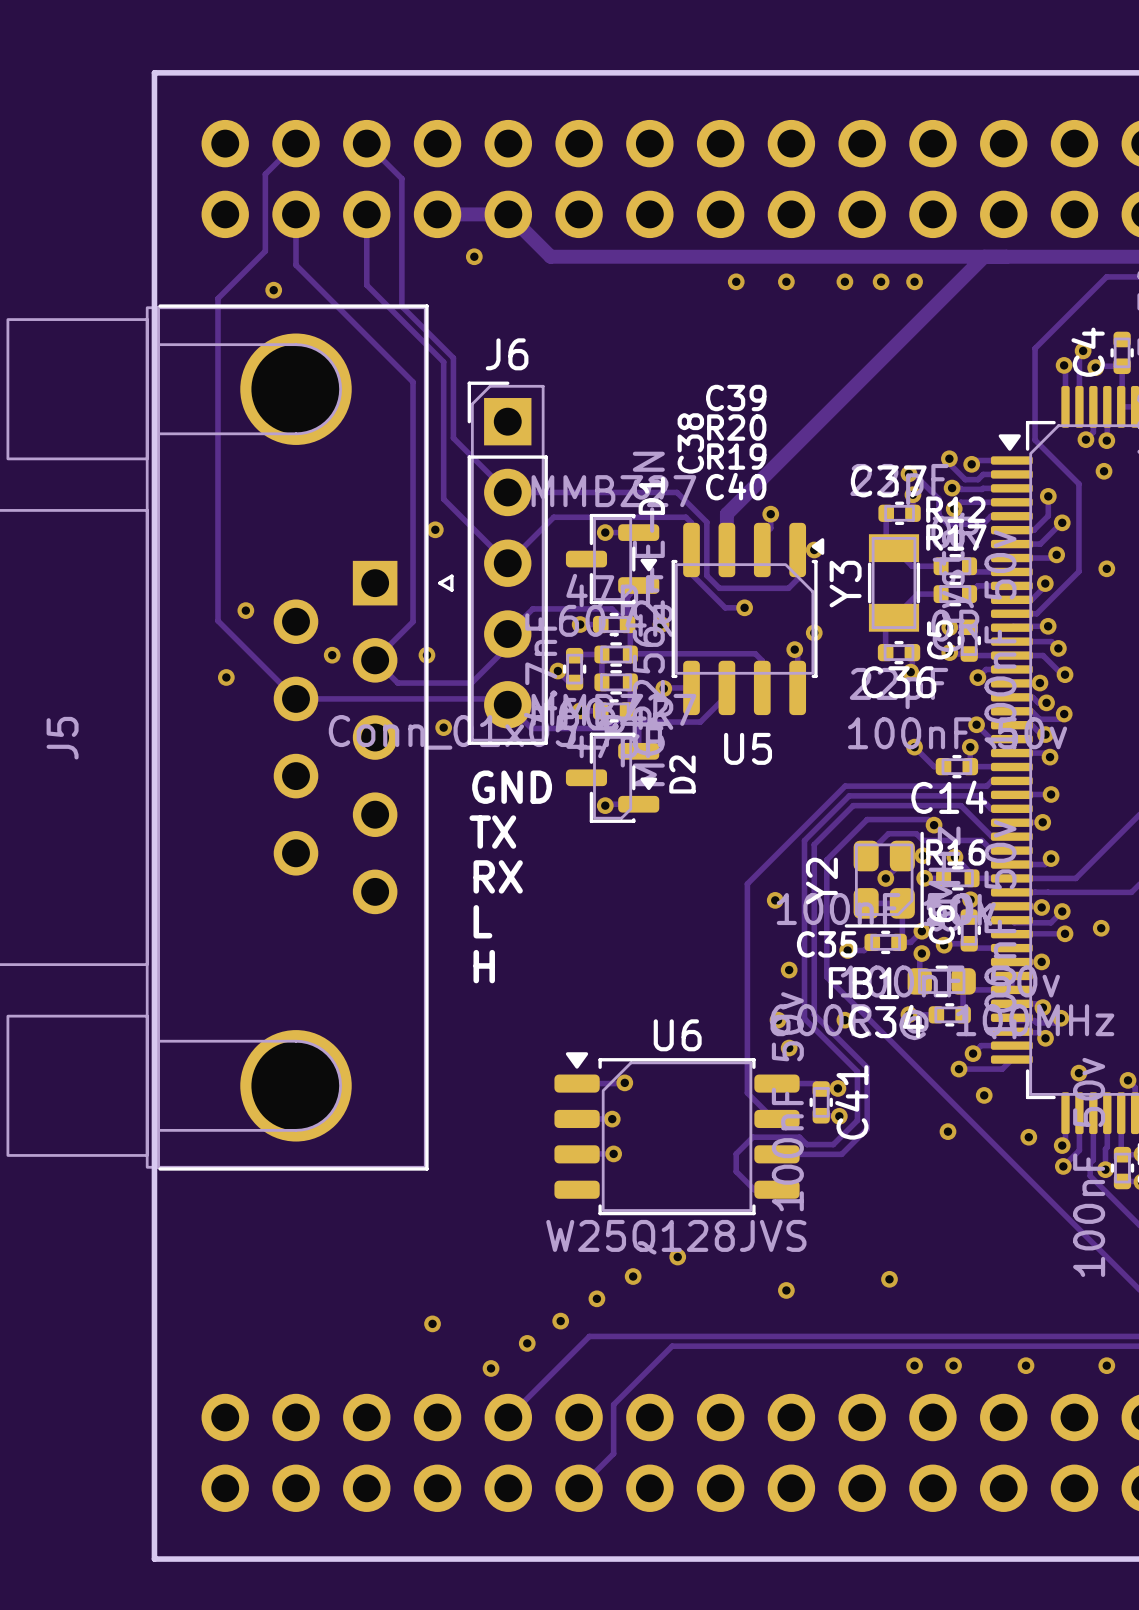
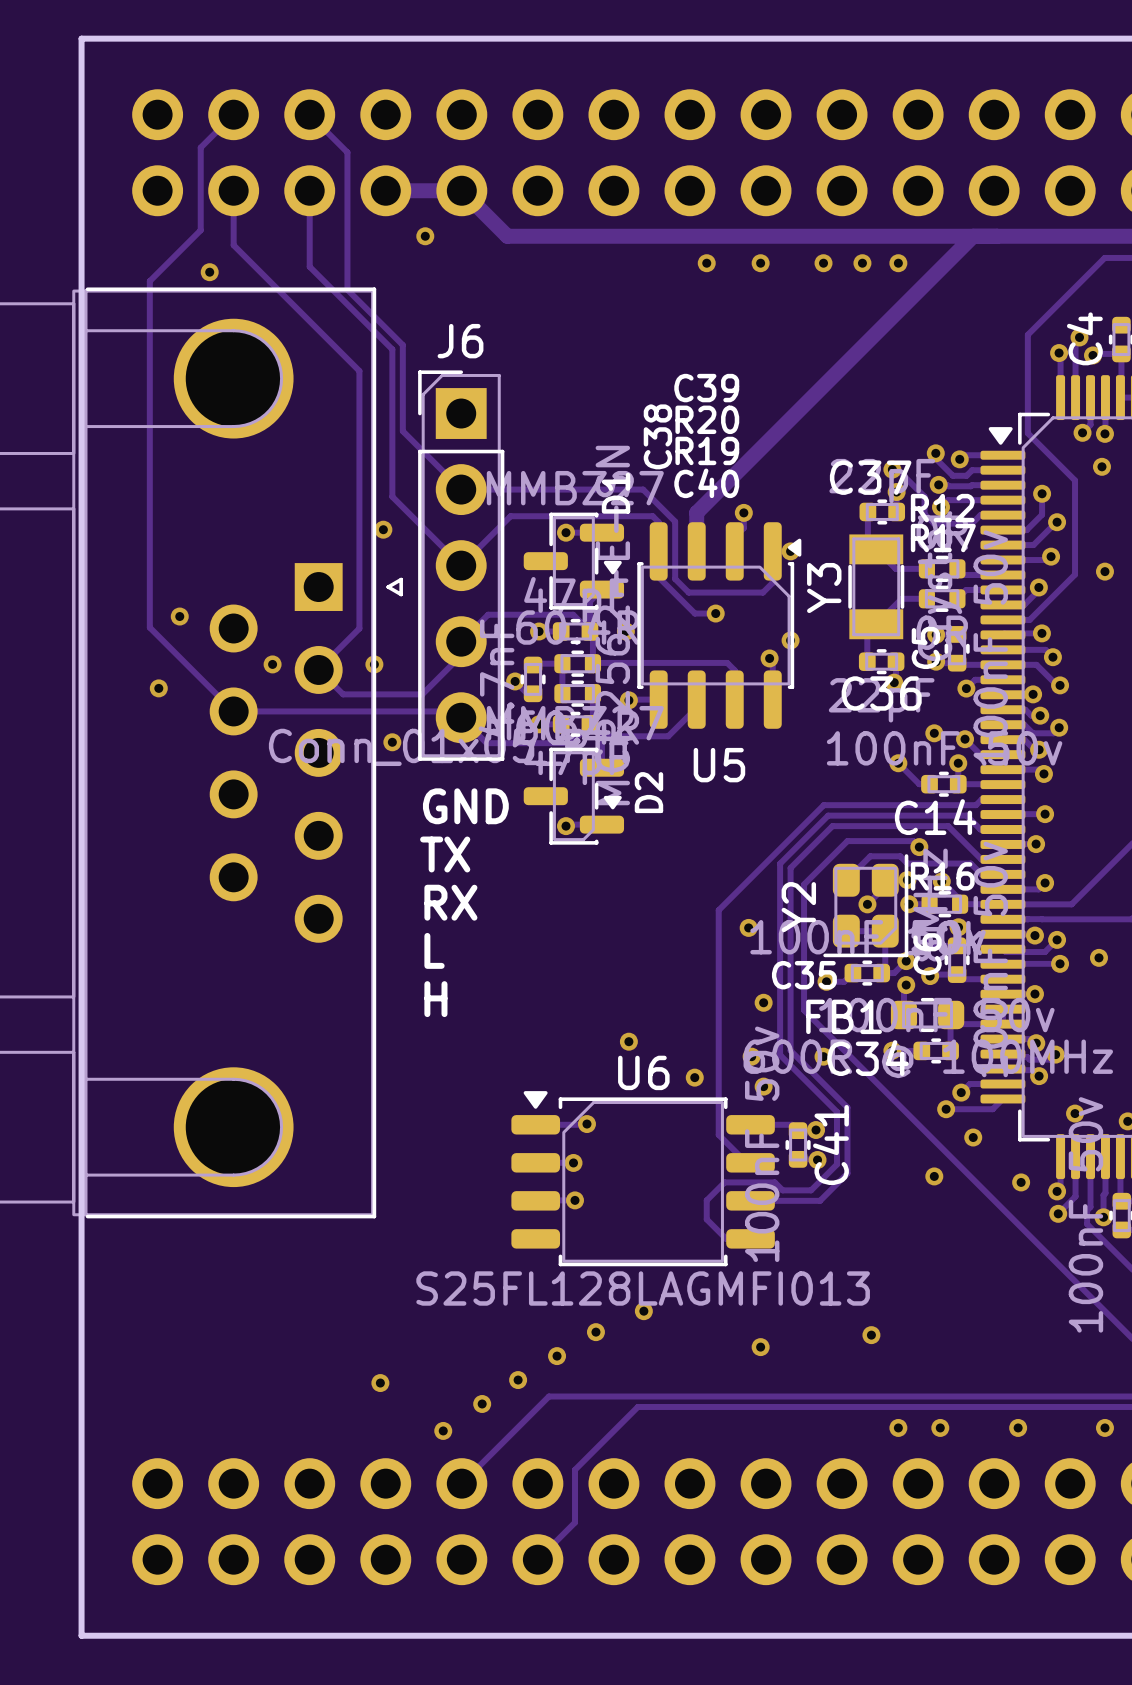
via: none -> (934, 733)
via: none -> (628, 1041)
via: none -> (694, 1077)
U6 value: W25Q128JVS (676, 1237) -> S25FL128LAGMFI013 (643, 1288)

